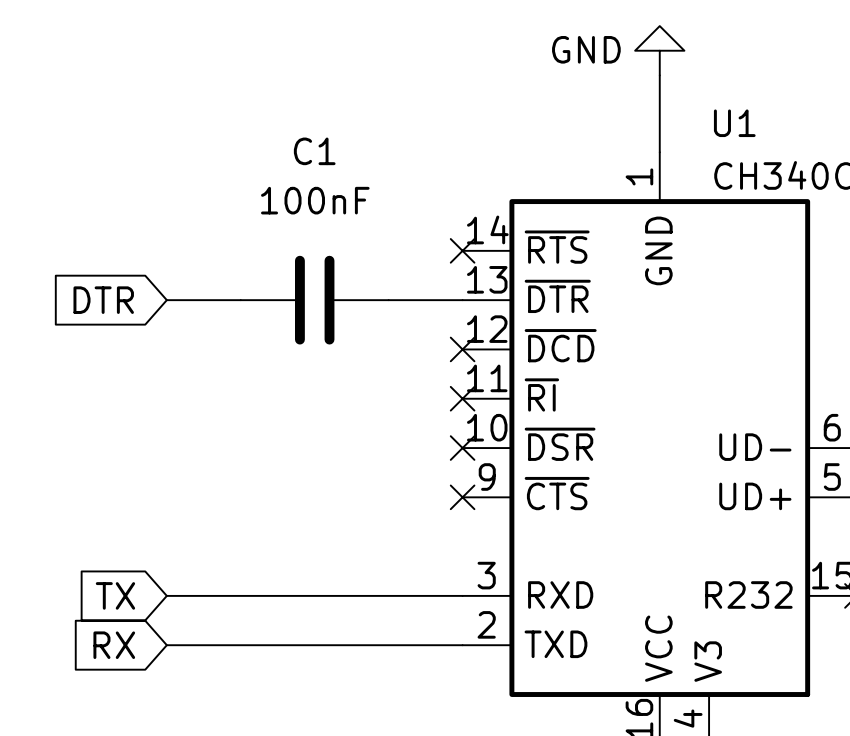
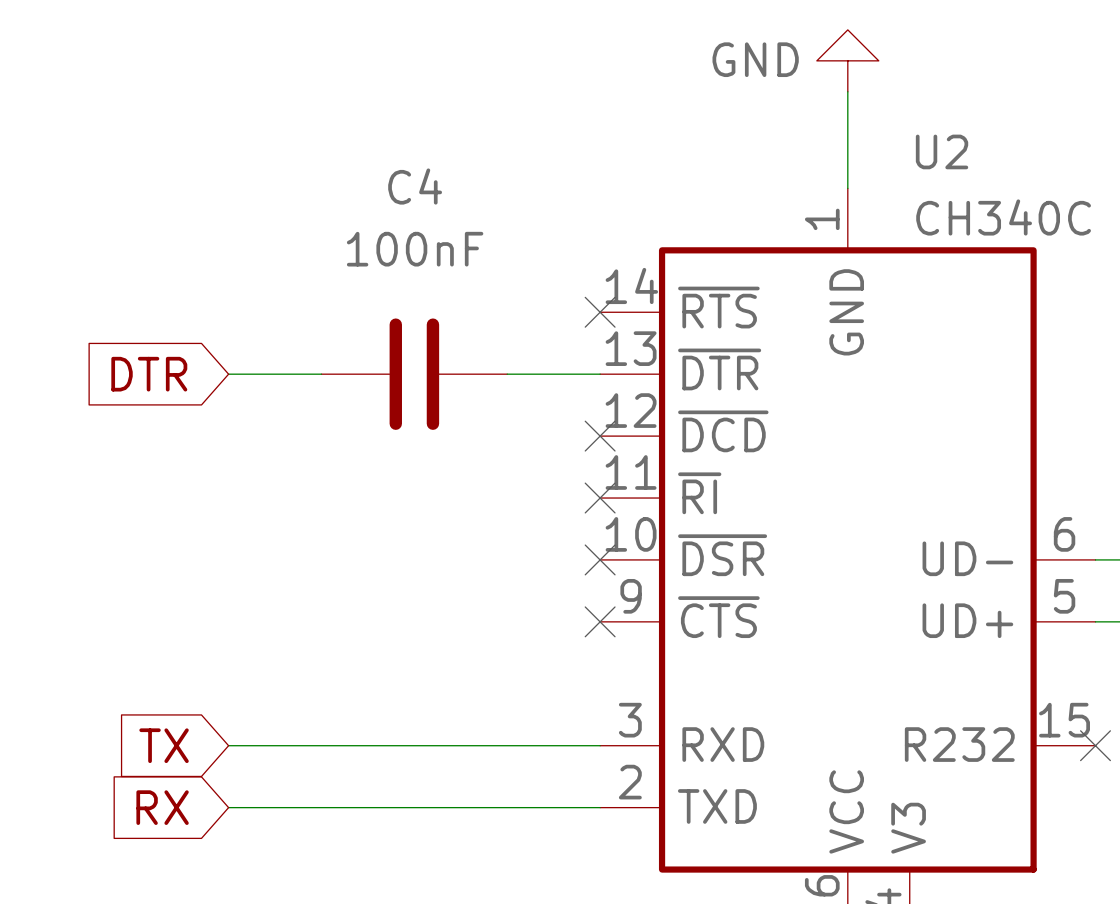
U1 name: U1 (734, 123) -> U2 (942, 151)
C1 name: C1 (314, 151) -> C4 (415, 186)

